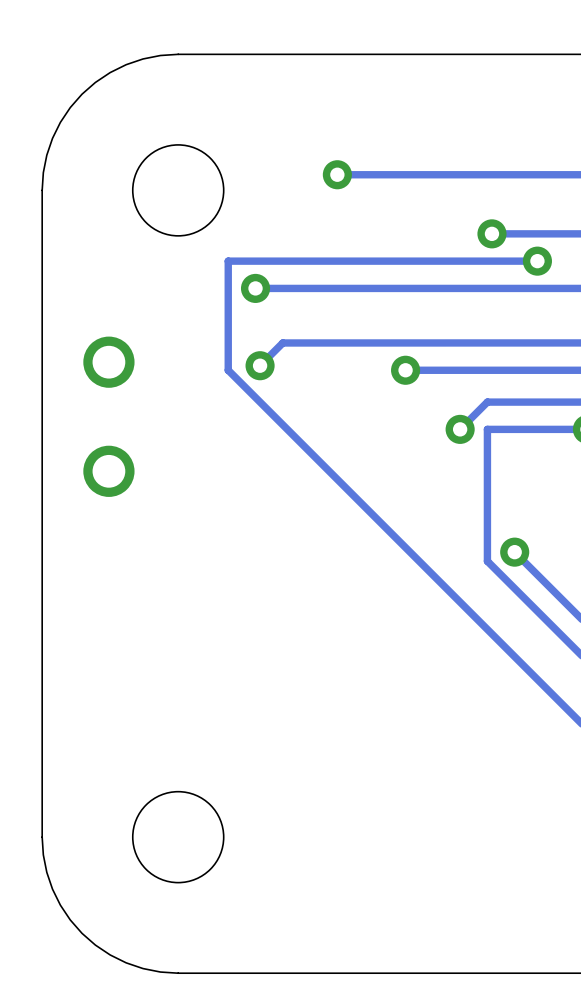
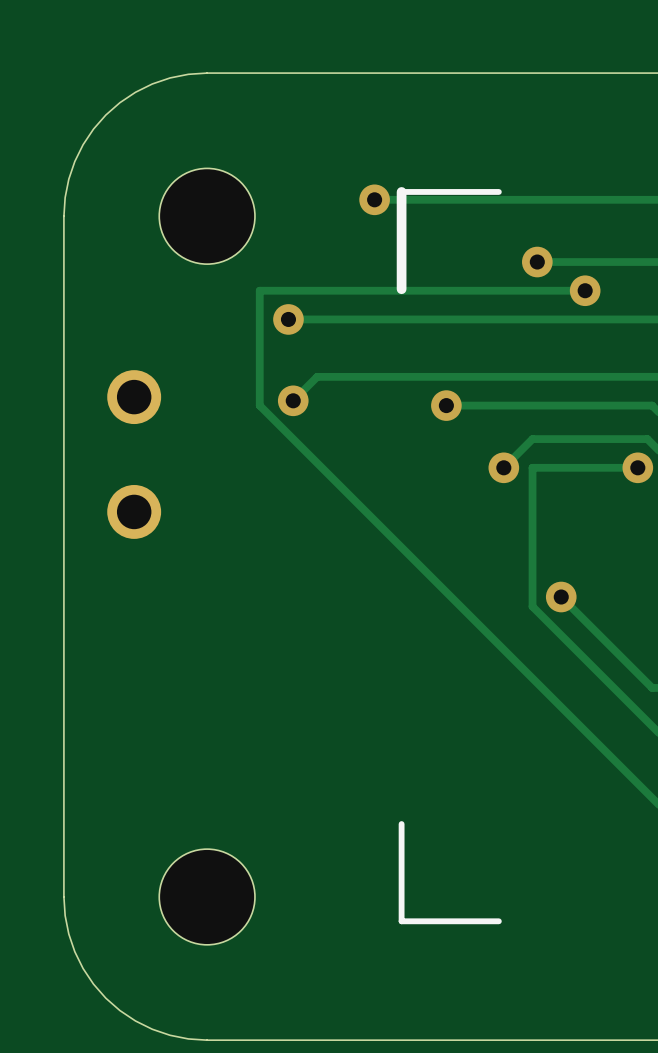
line: none -> (498, 191) (401, 191) (401, 289)
line: none -> (401, 824) (401, 921) (498, 921)

